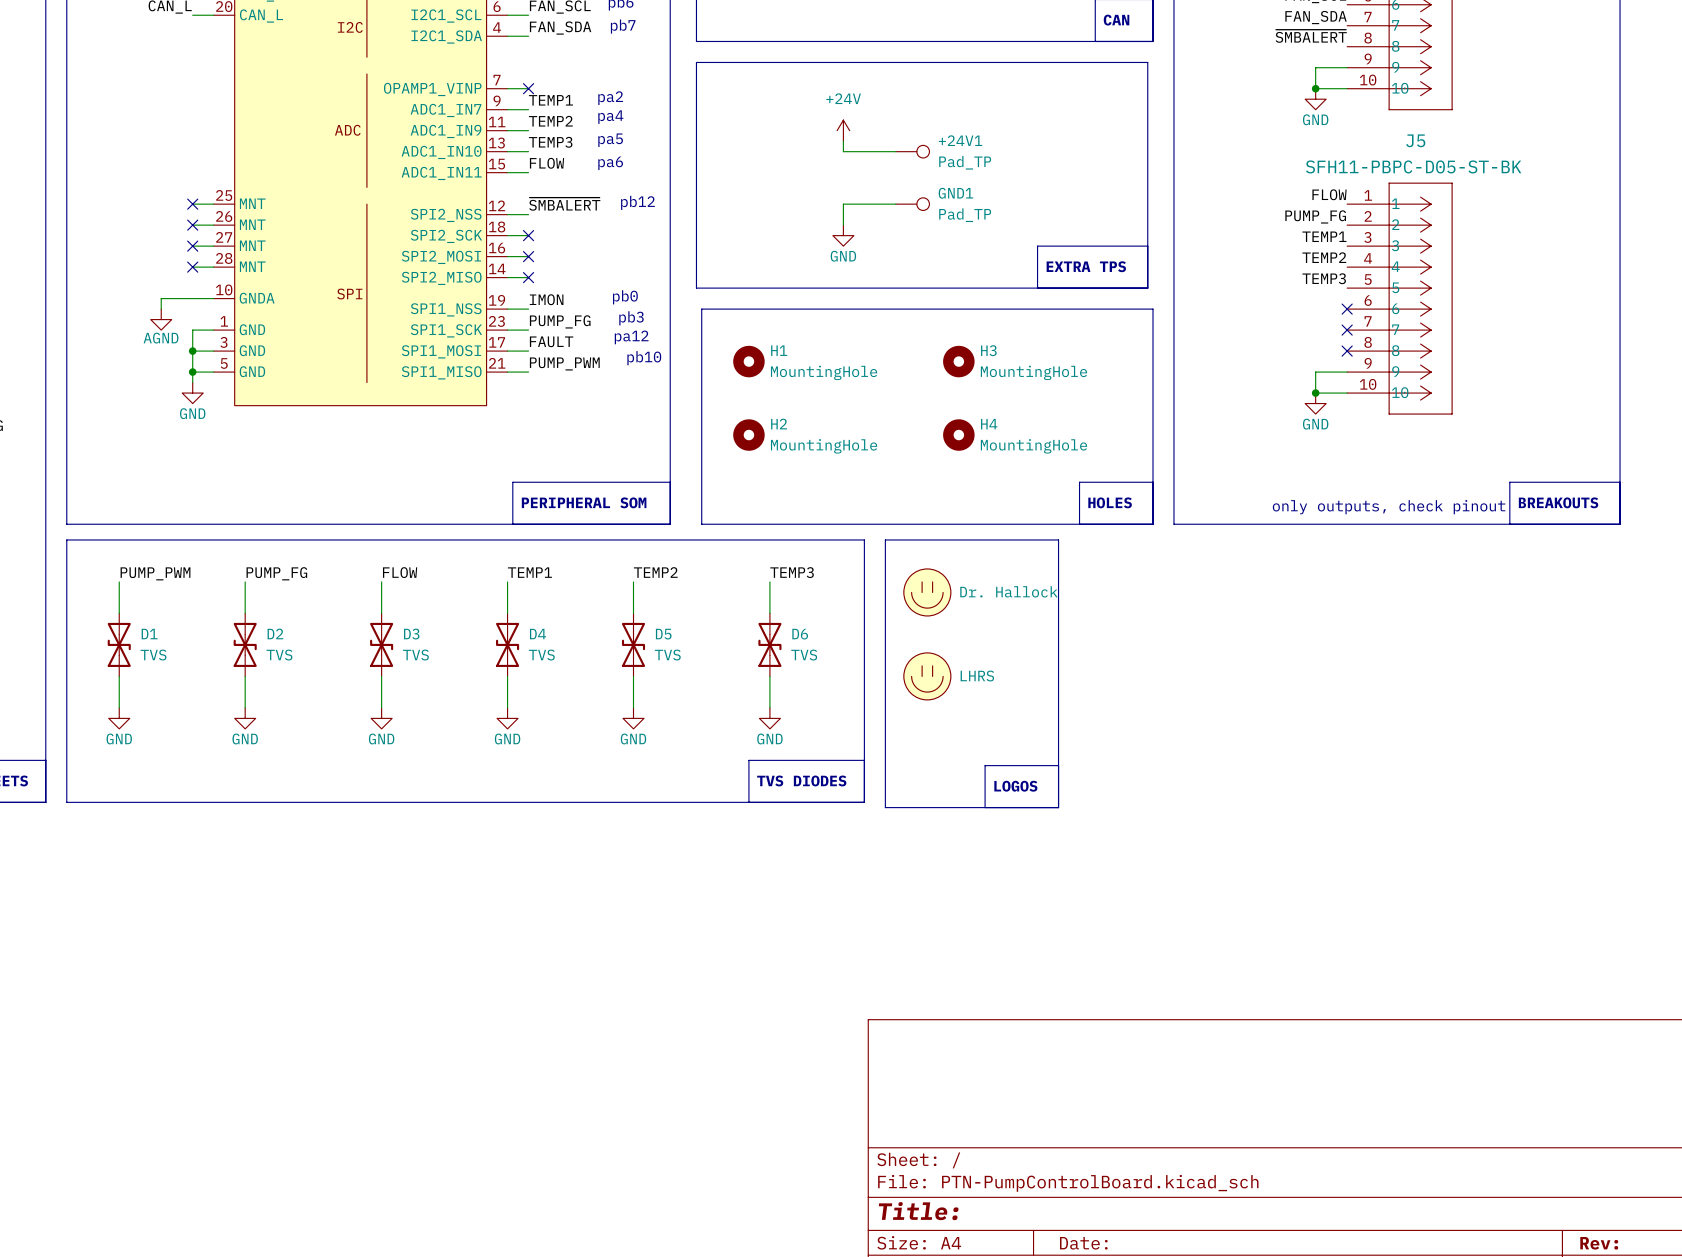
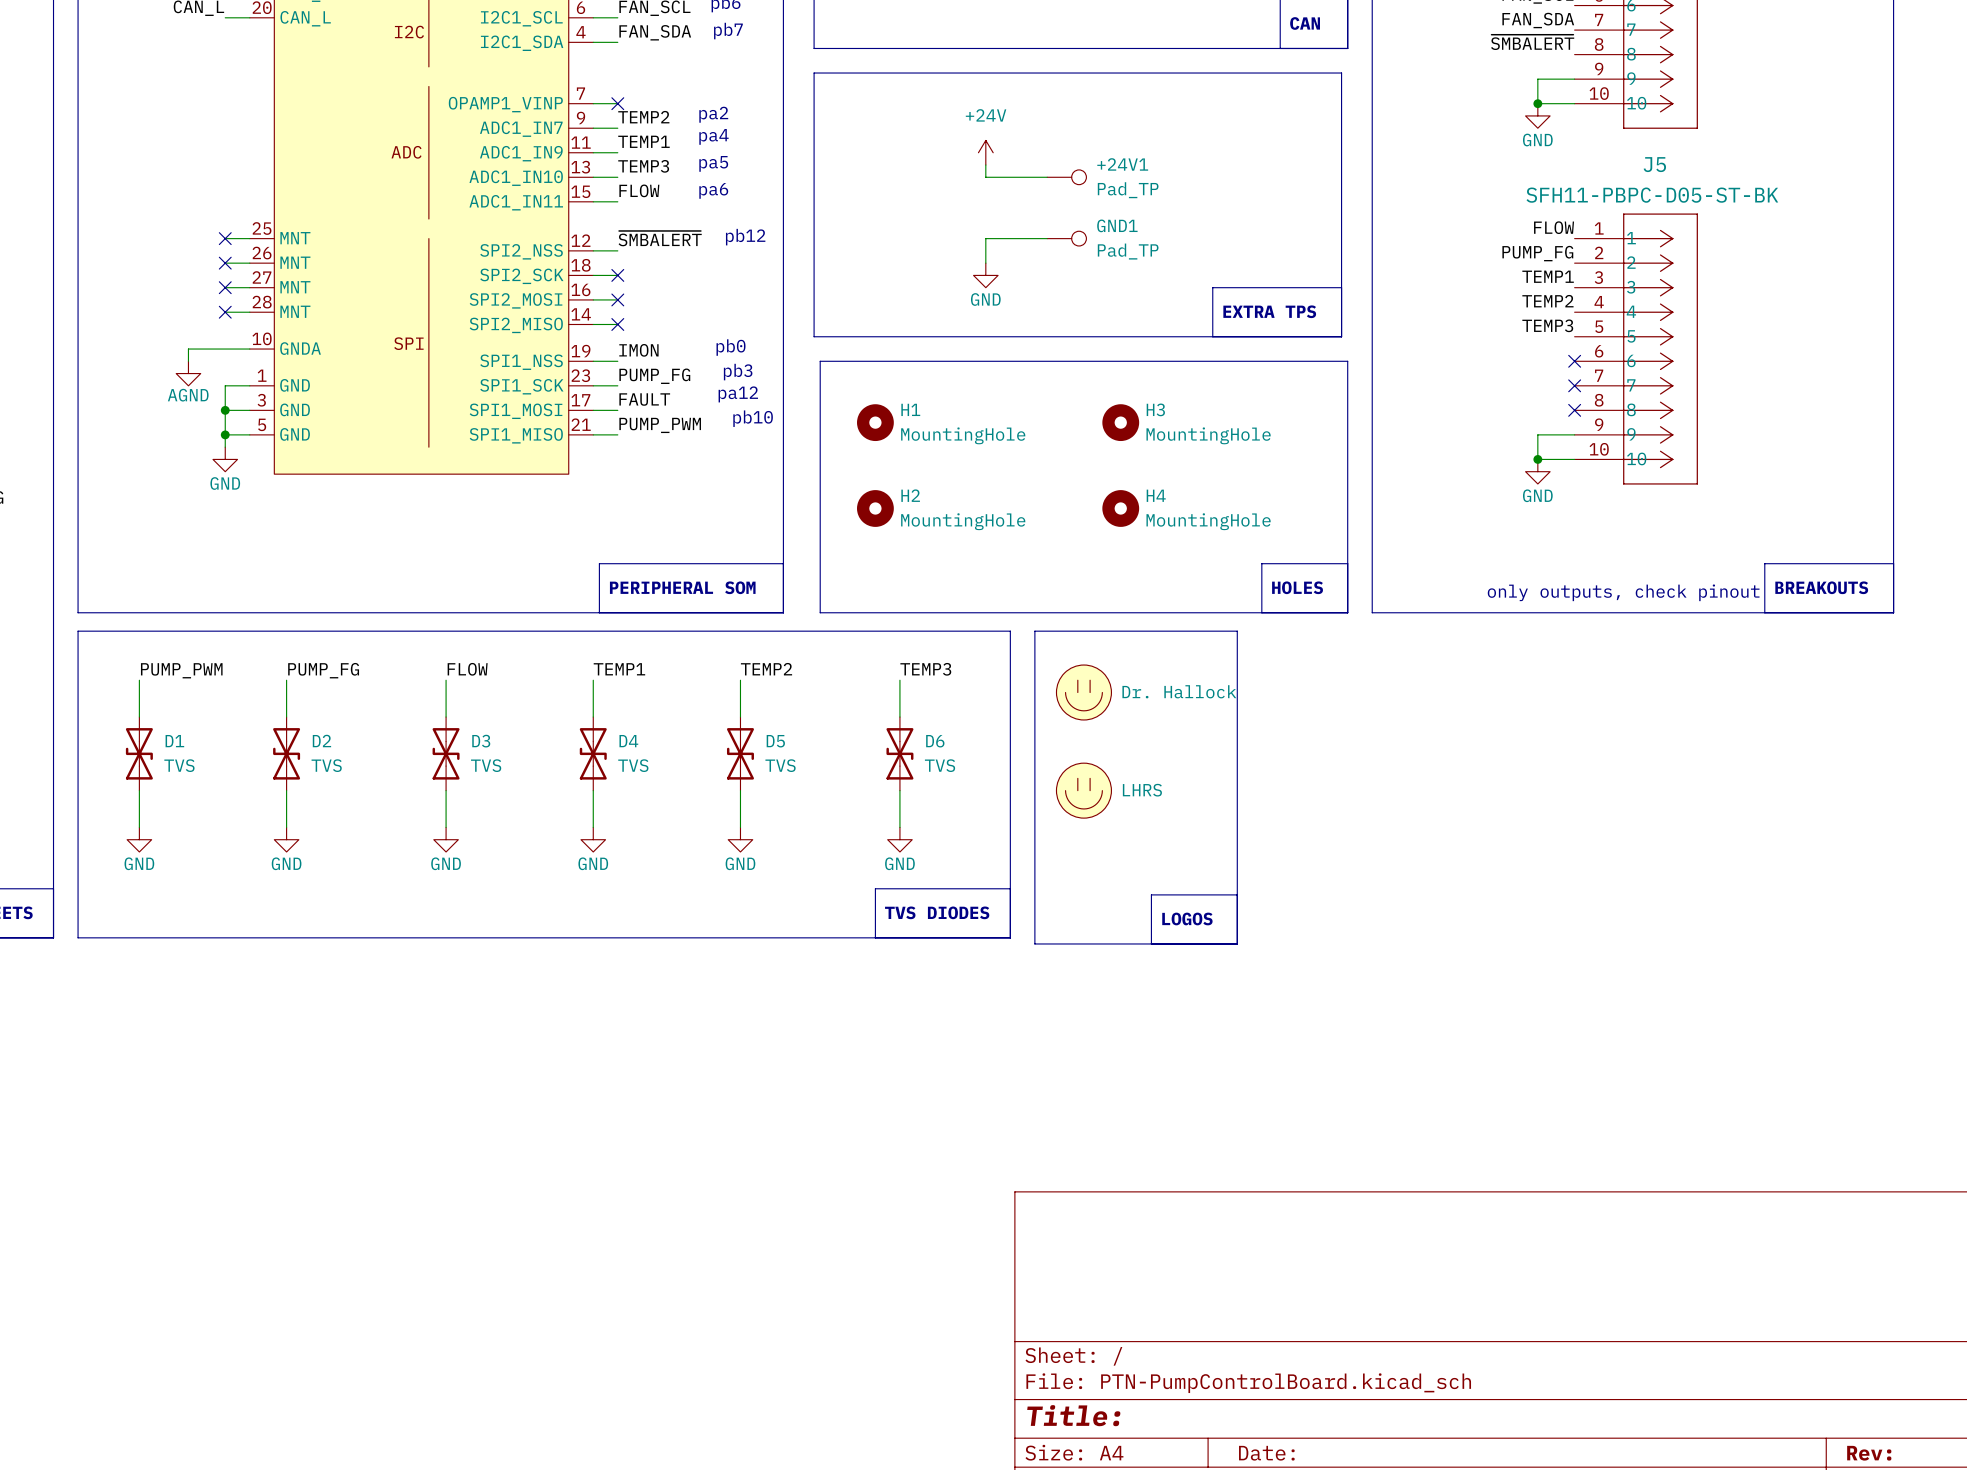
label: TEMP1 (550, 100) -> TEMP2 (643, 117)
label: TEMP2 (550, 121) -> TEMP1 (643, 141)

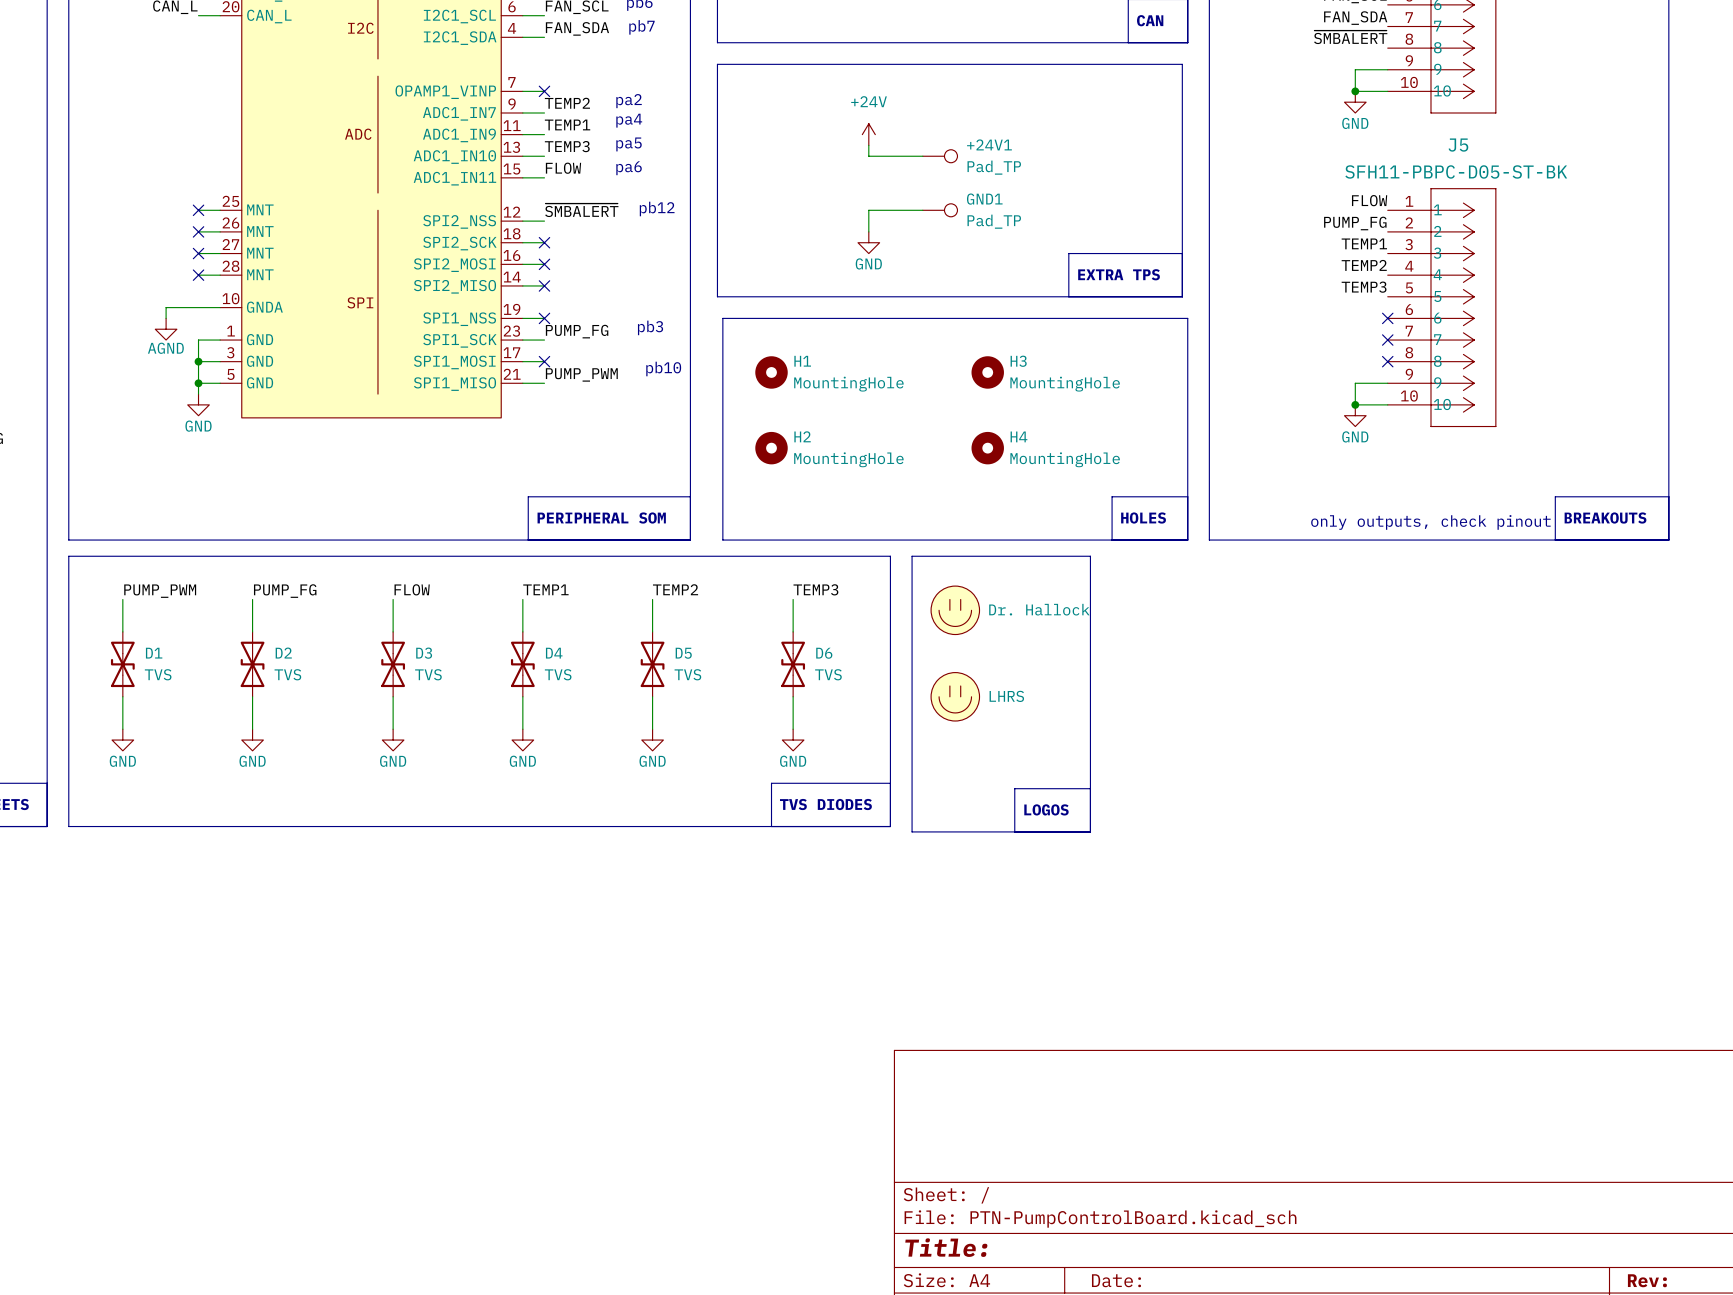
text: pb0 (731, 347) -> none
label: IMON (638, 350) -> none
no-connect mark: none -> (544, 318)
text: pa12 (738, 394) -> none
label: FAULT (644, 399) -> none
no-connect mark: none -> (544, 361)

